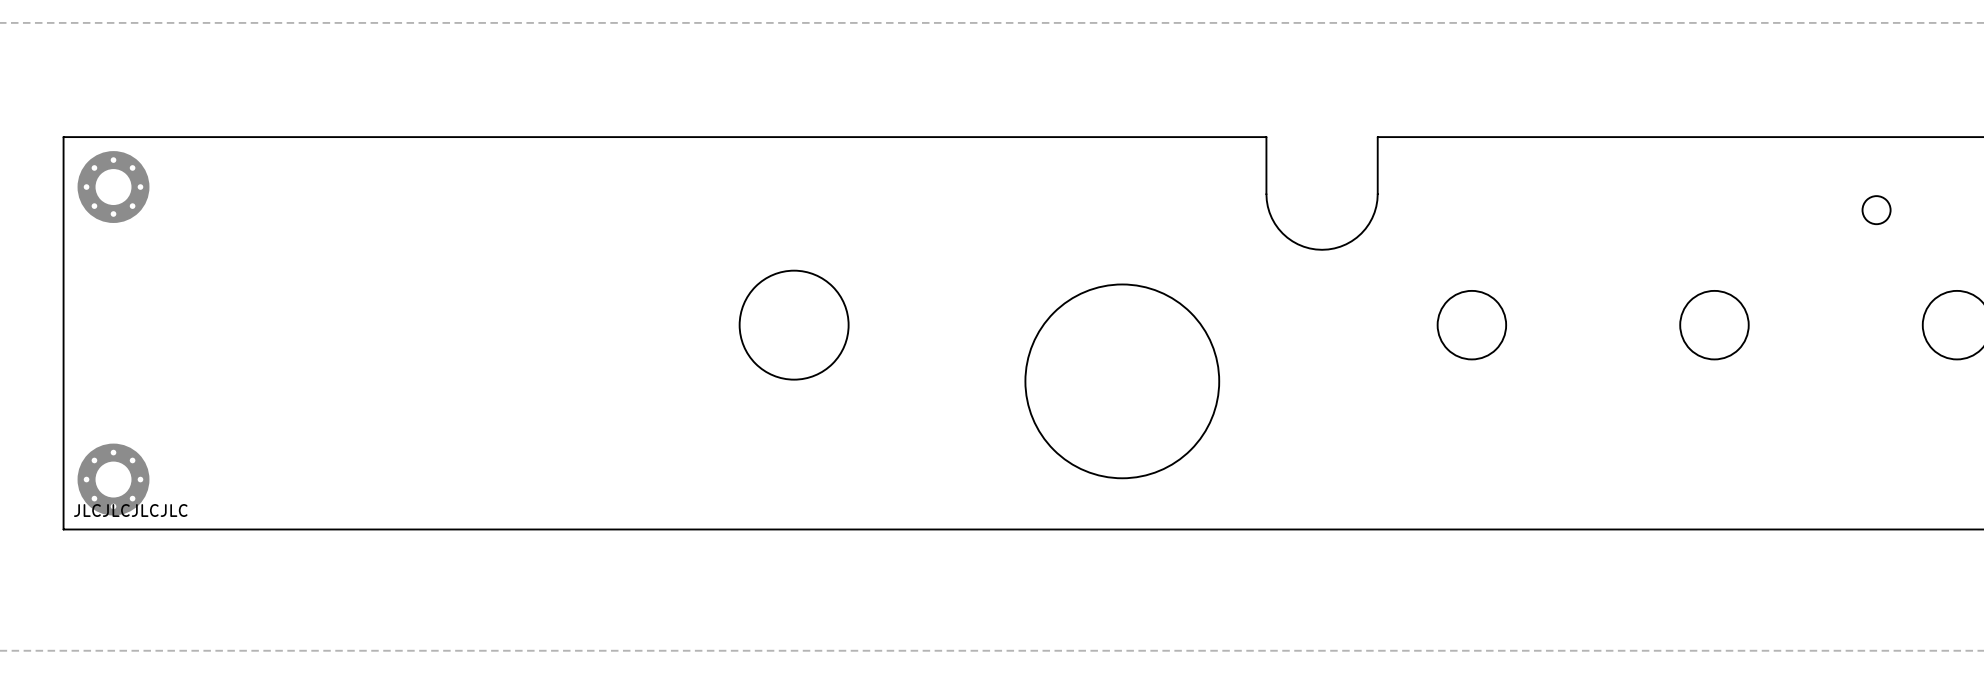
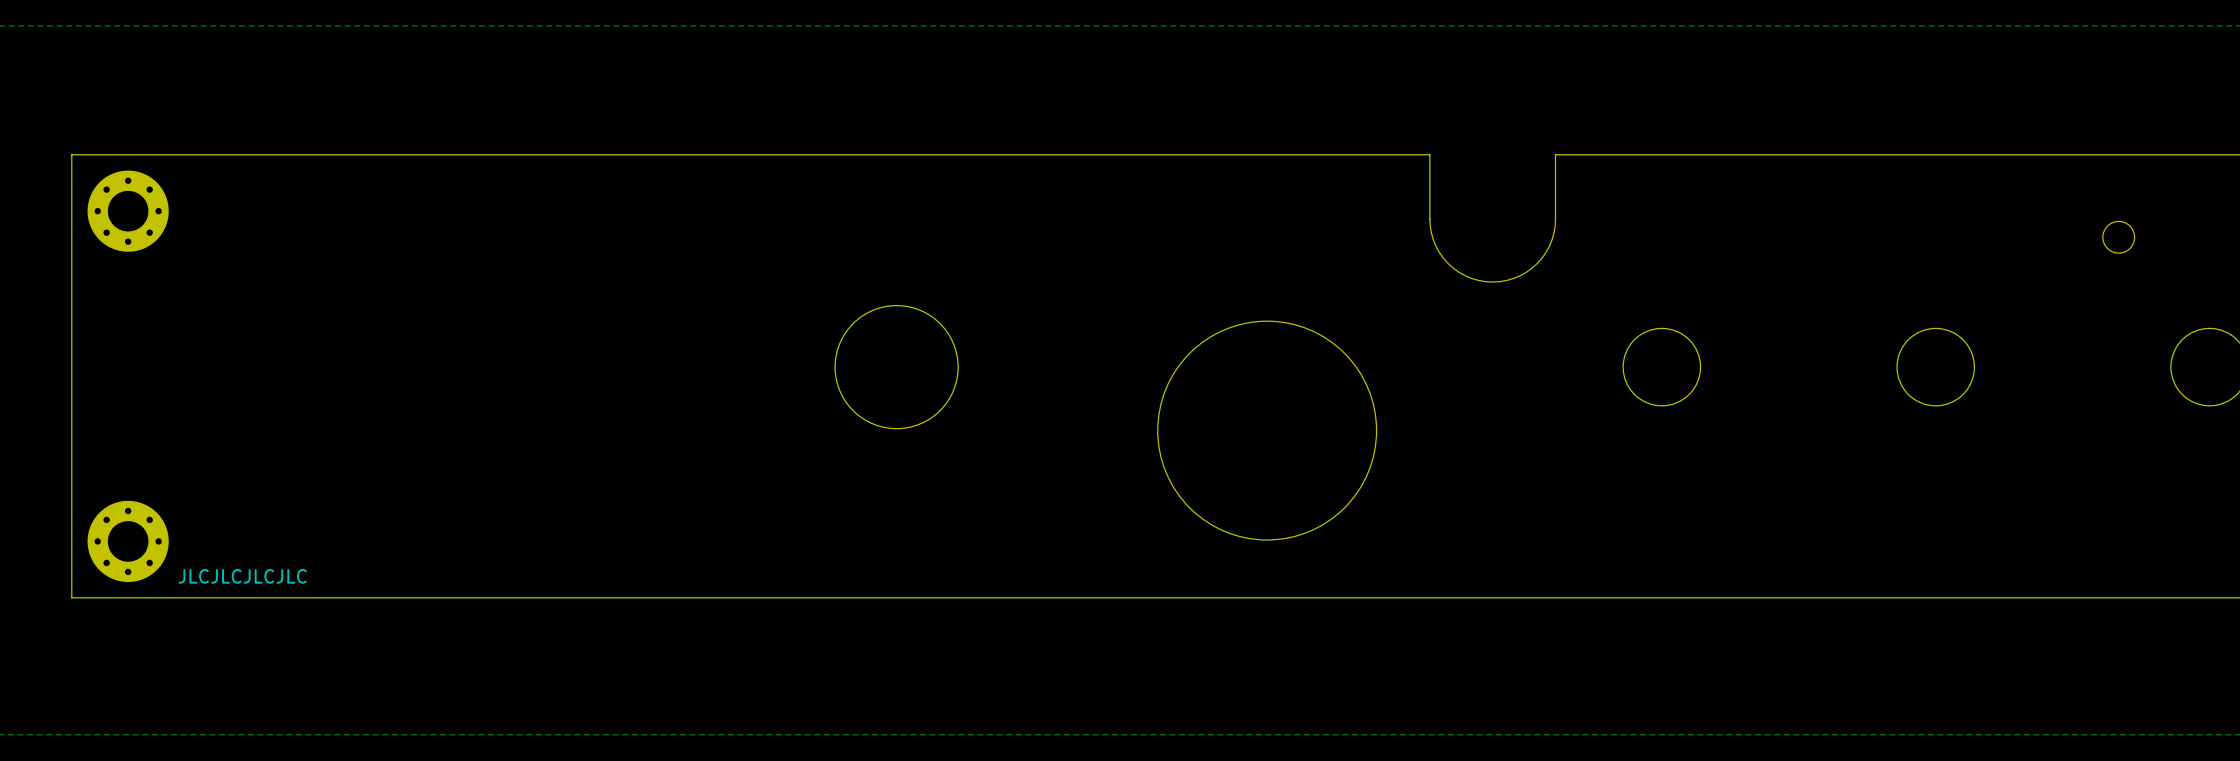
text position: JLCJLCJLCJLC (130, 510) -> JLCJLCJLCJLC (242, 576)

